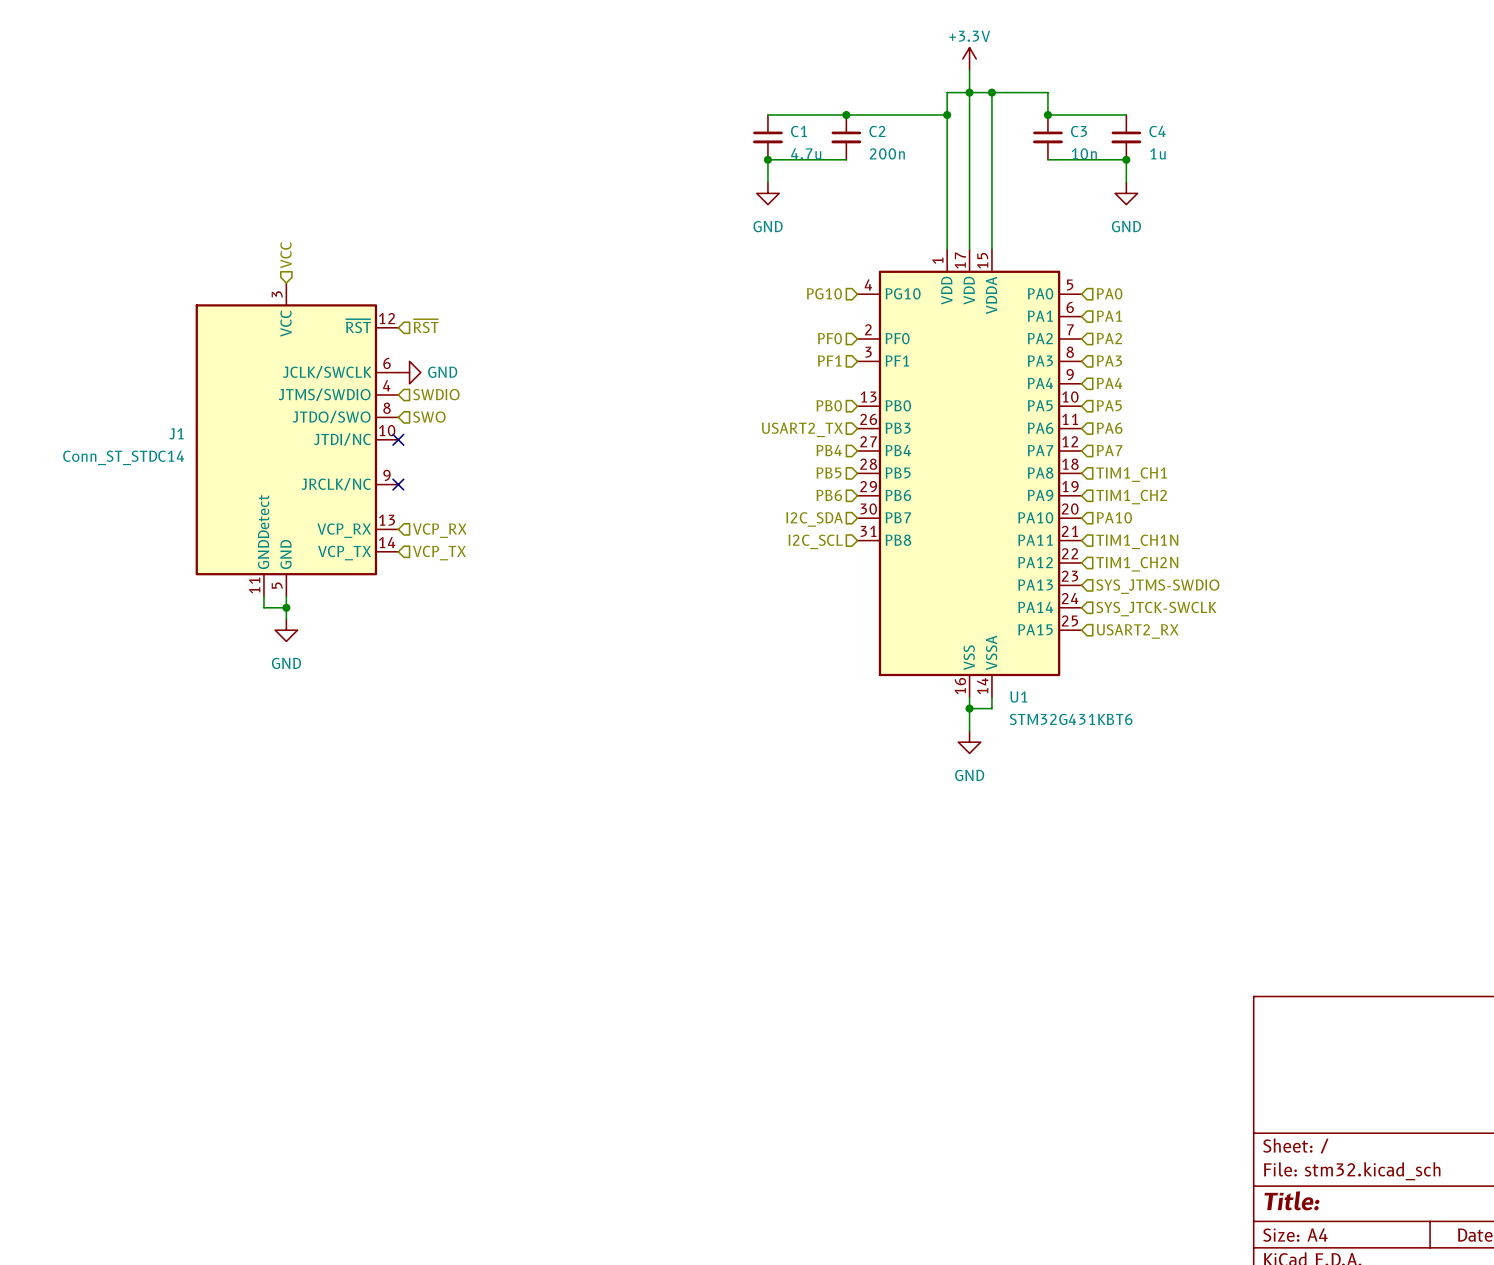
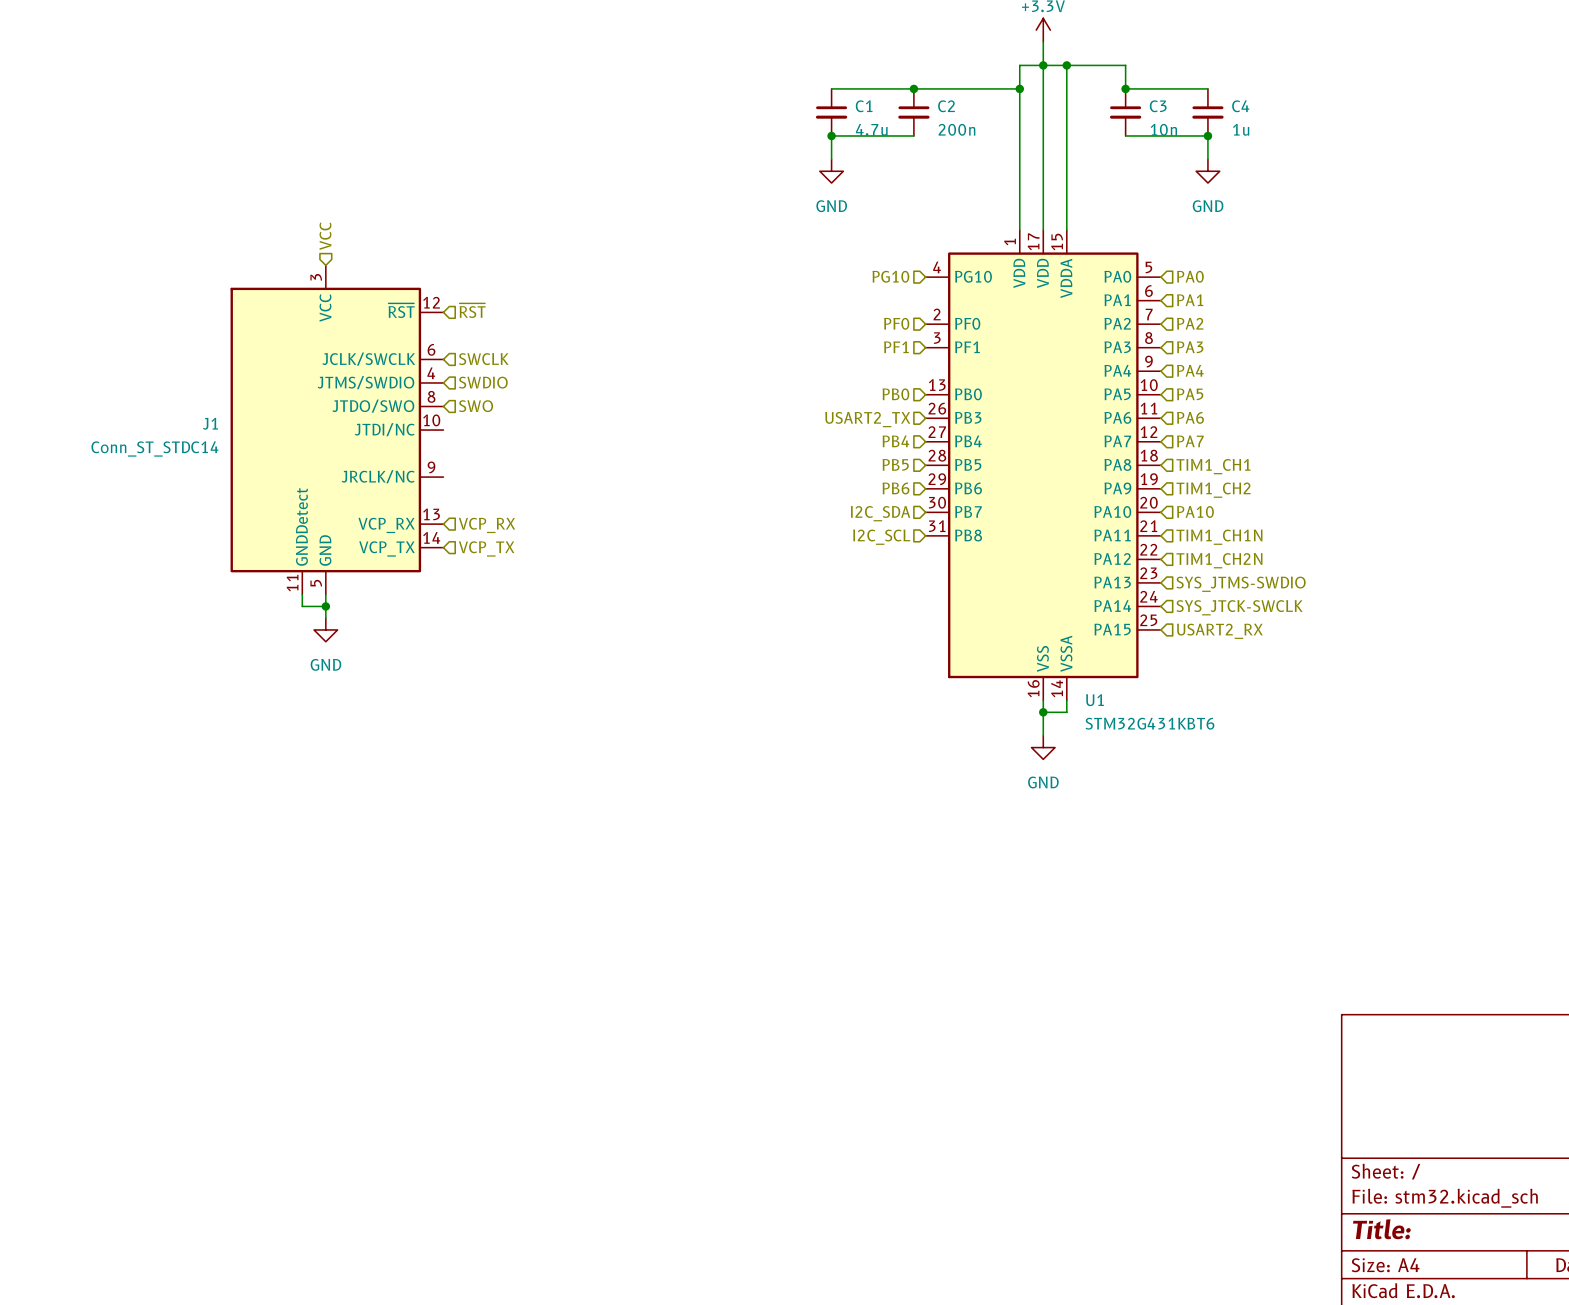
power symbol: GND (409, 372) -> none
hierarchical label: none -> SWCLK (483, 359)
no-connect mark: (398, 439) -> none
no-connect mark: (398, 484) -> none

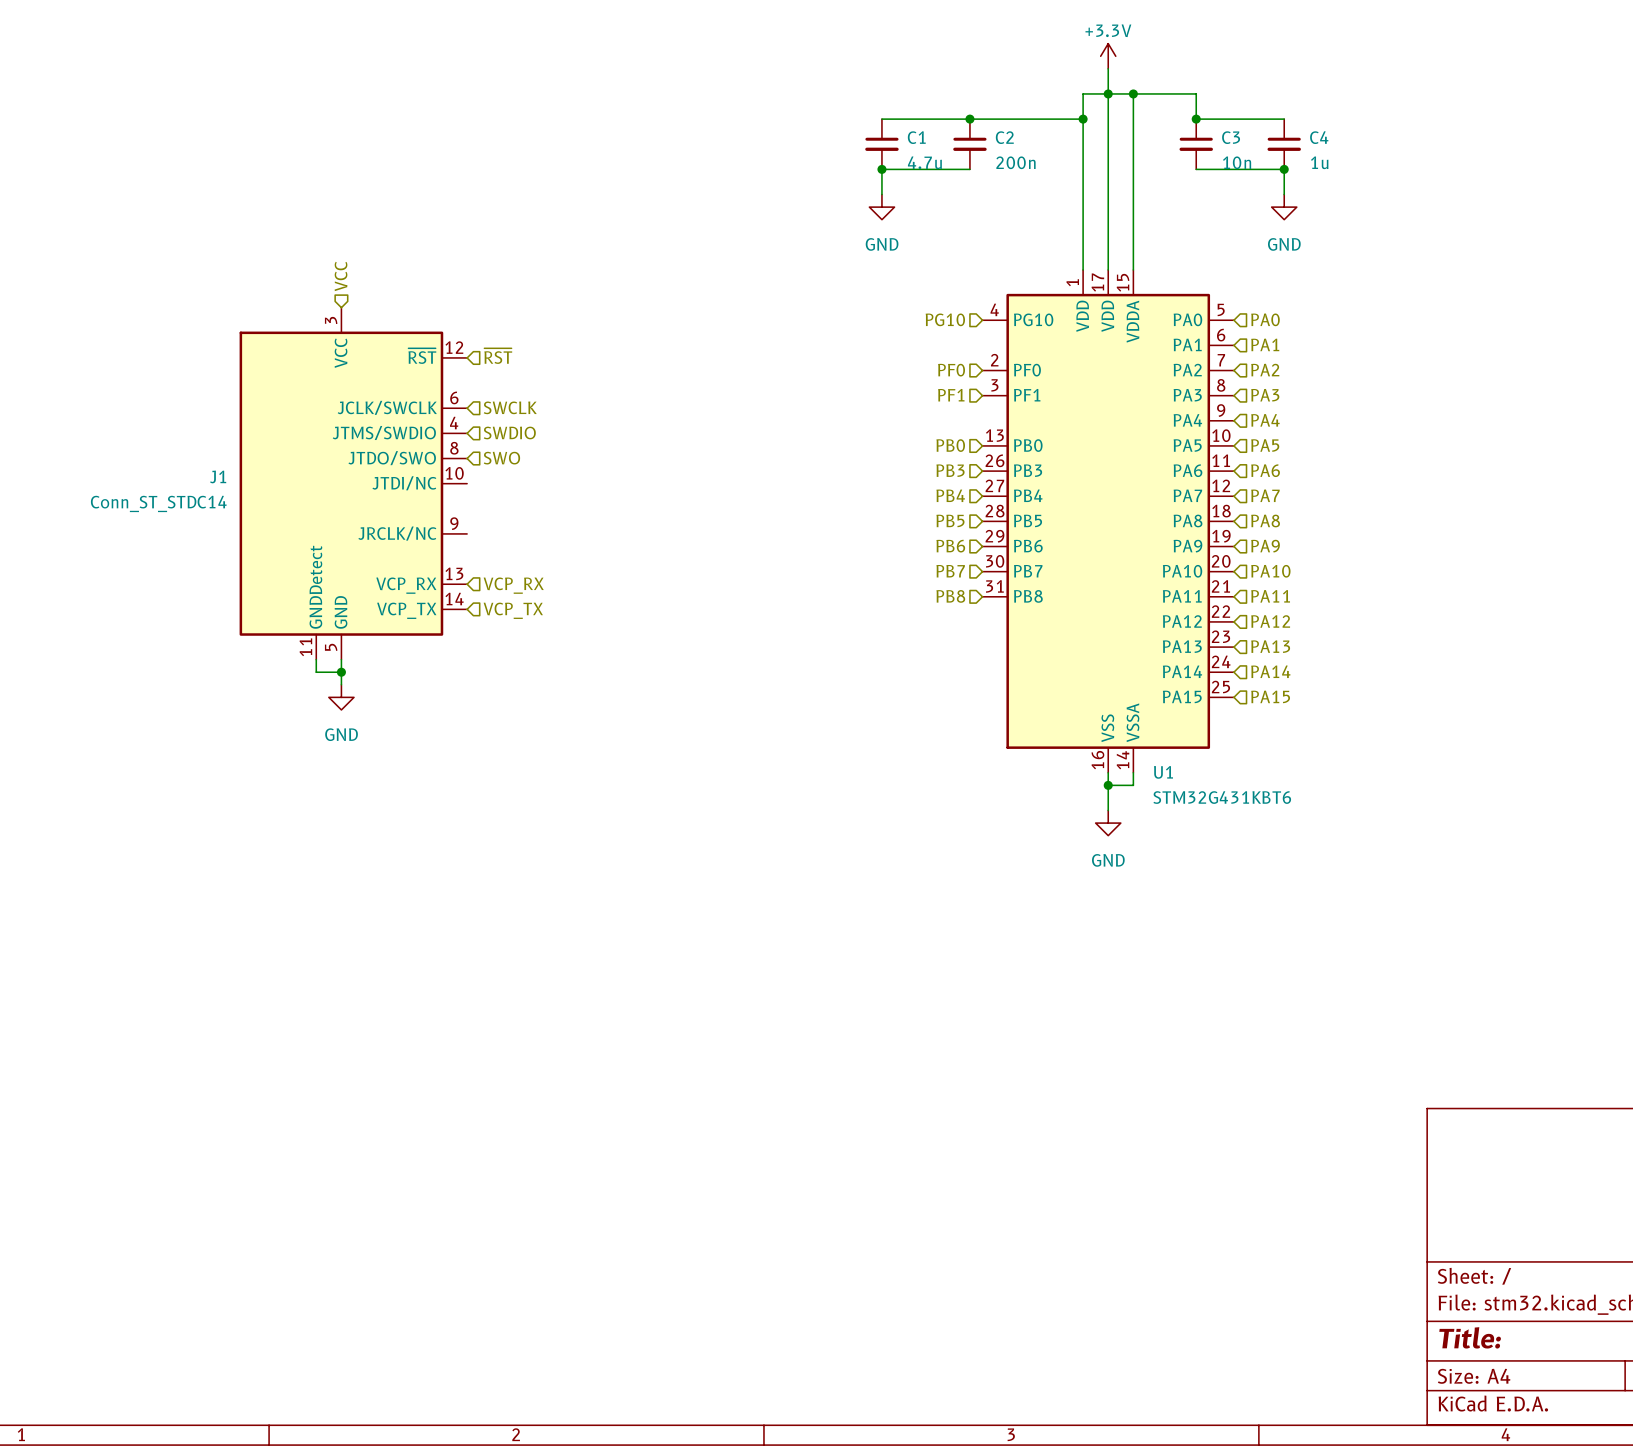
hierarchical label: USART2_TX (867, 419) -> PB3 (950, 470)
hierarchical label: TIM1_CH1 (1213, 466) -> PA8 (1265, 520)
hierarchical label: TIM1_CH2 (1213, 490) -> PA9 (1265, 546)
hierarchical label: I2C_SDA (880, 513) -> PB7 (950, 571)
hierarchical label: I2C_SCL (881, 537) -> PB8 (950, 596)
hierarchical label: TIM1_CH1N (1219, 537) -> PA11 (1270, 596)
hierarchical label: TIM1_CH2N (1219, 560) -> PA12 (1270, 621)
hierarchical label: SYS_JTMS-SWDIO (1241, 584) -> PA13 (1270, 646)
hierarchical label: SYS_JTCK-SWCLK (1239, 607) -> PA14 (1270, 671)
hierarchical label: USART2_RX (1219, 631) -> PA15 (1270, 696)

